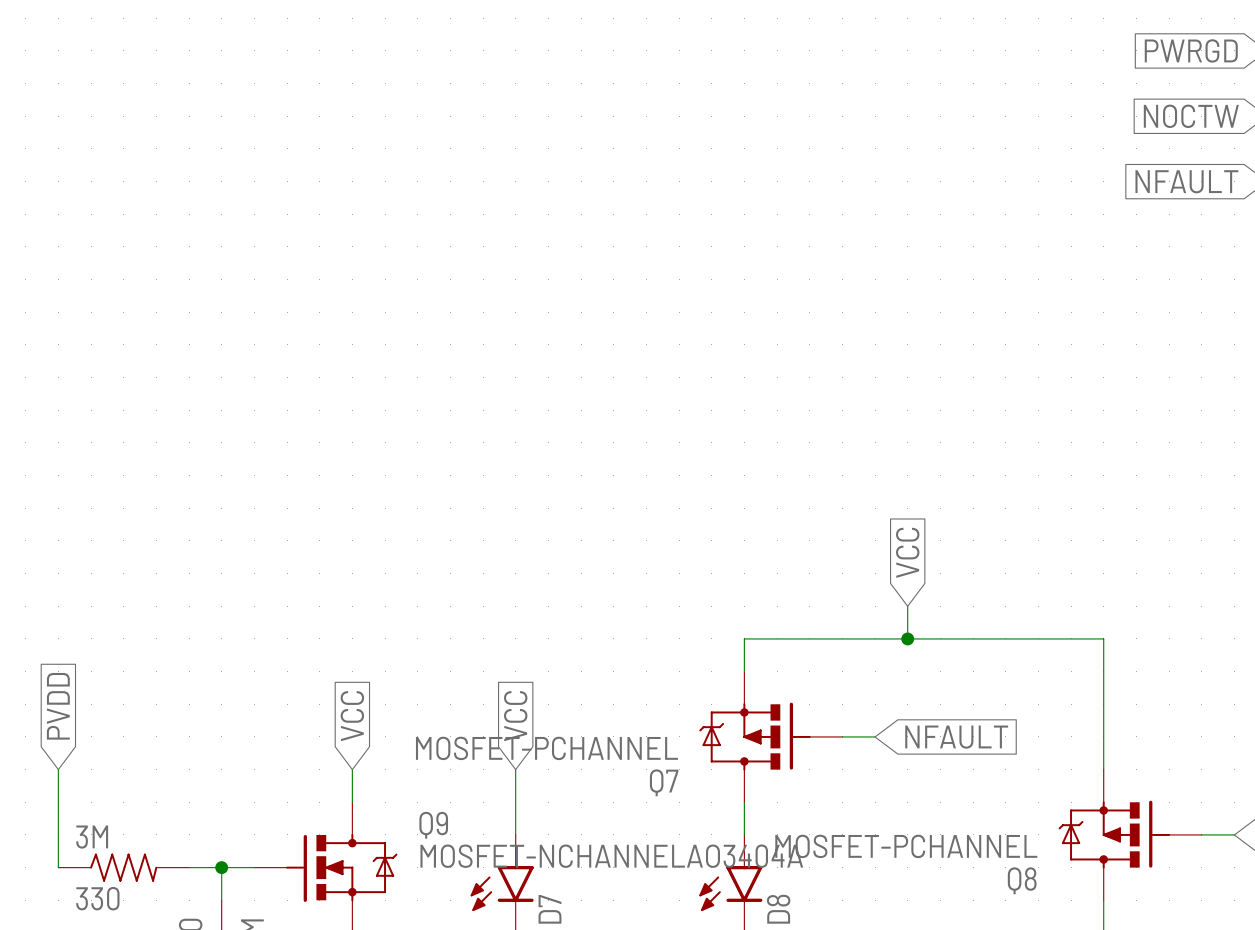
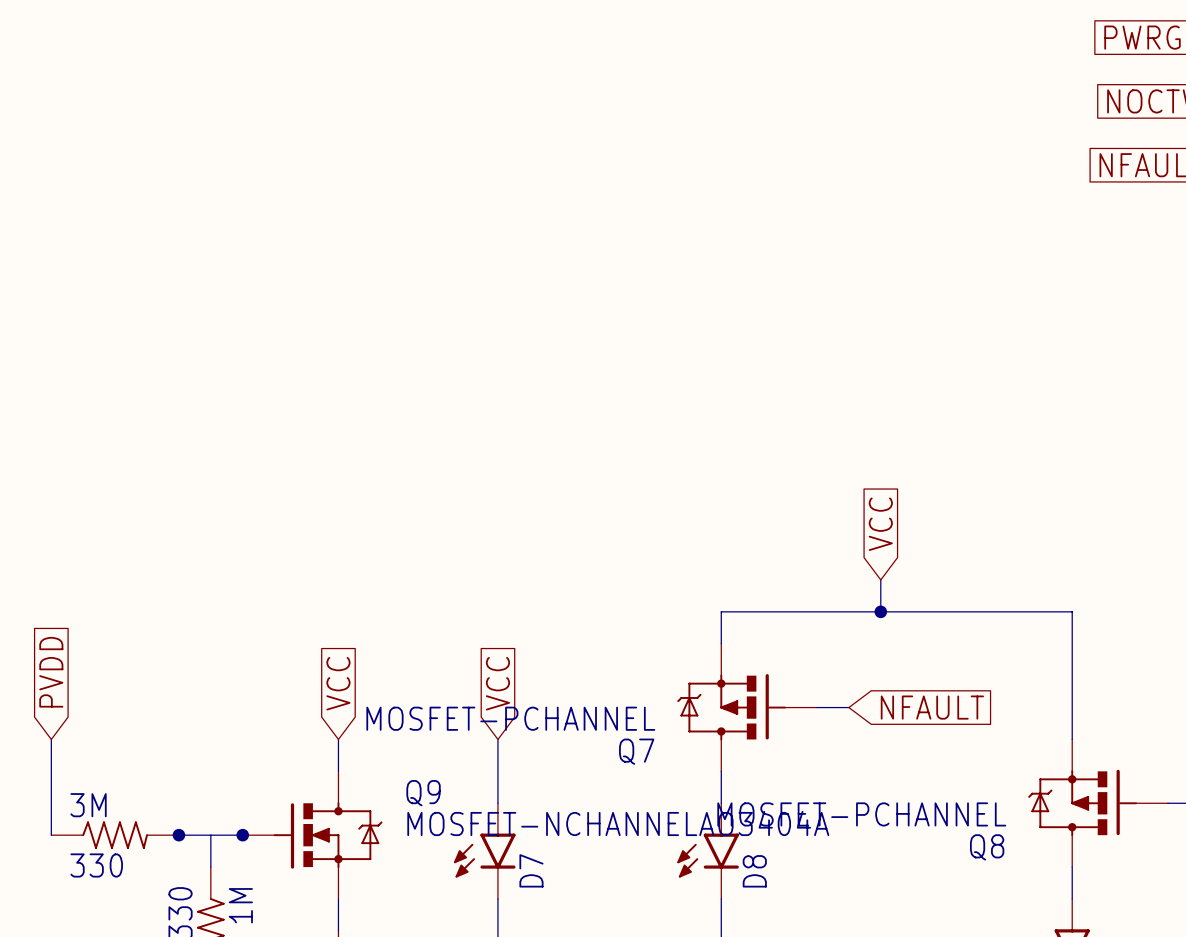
junction: none -> (178, 835)
junction: (221, 867) -> none
junction: none -> (242, 835)

